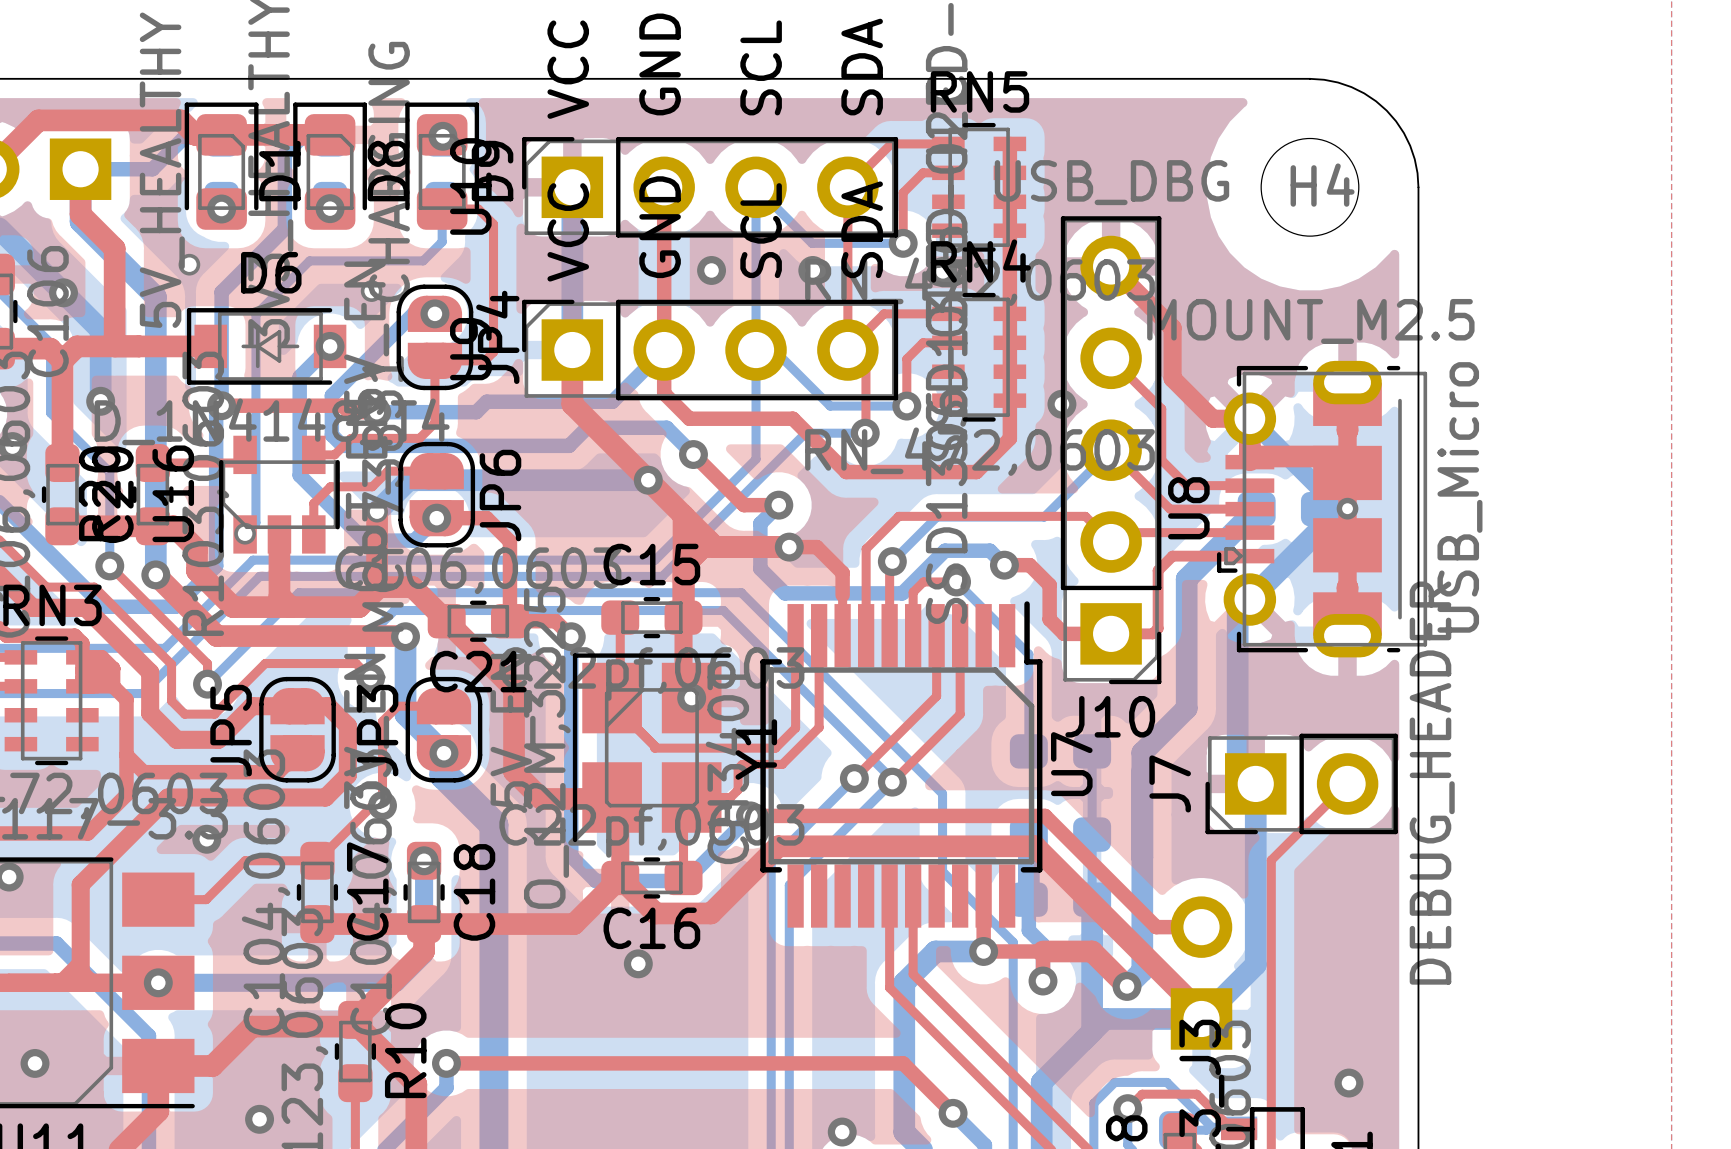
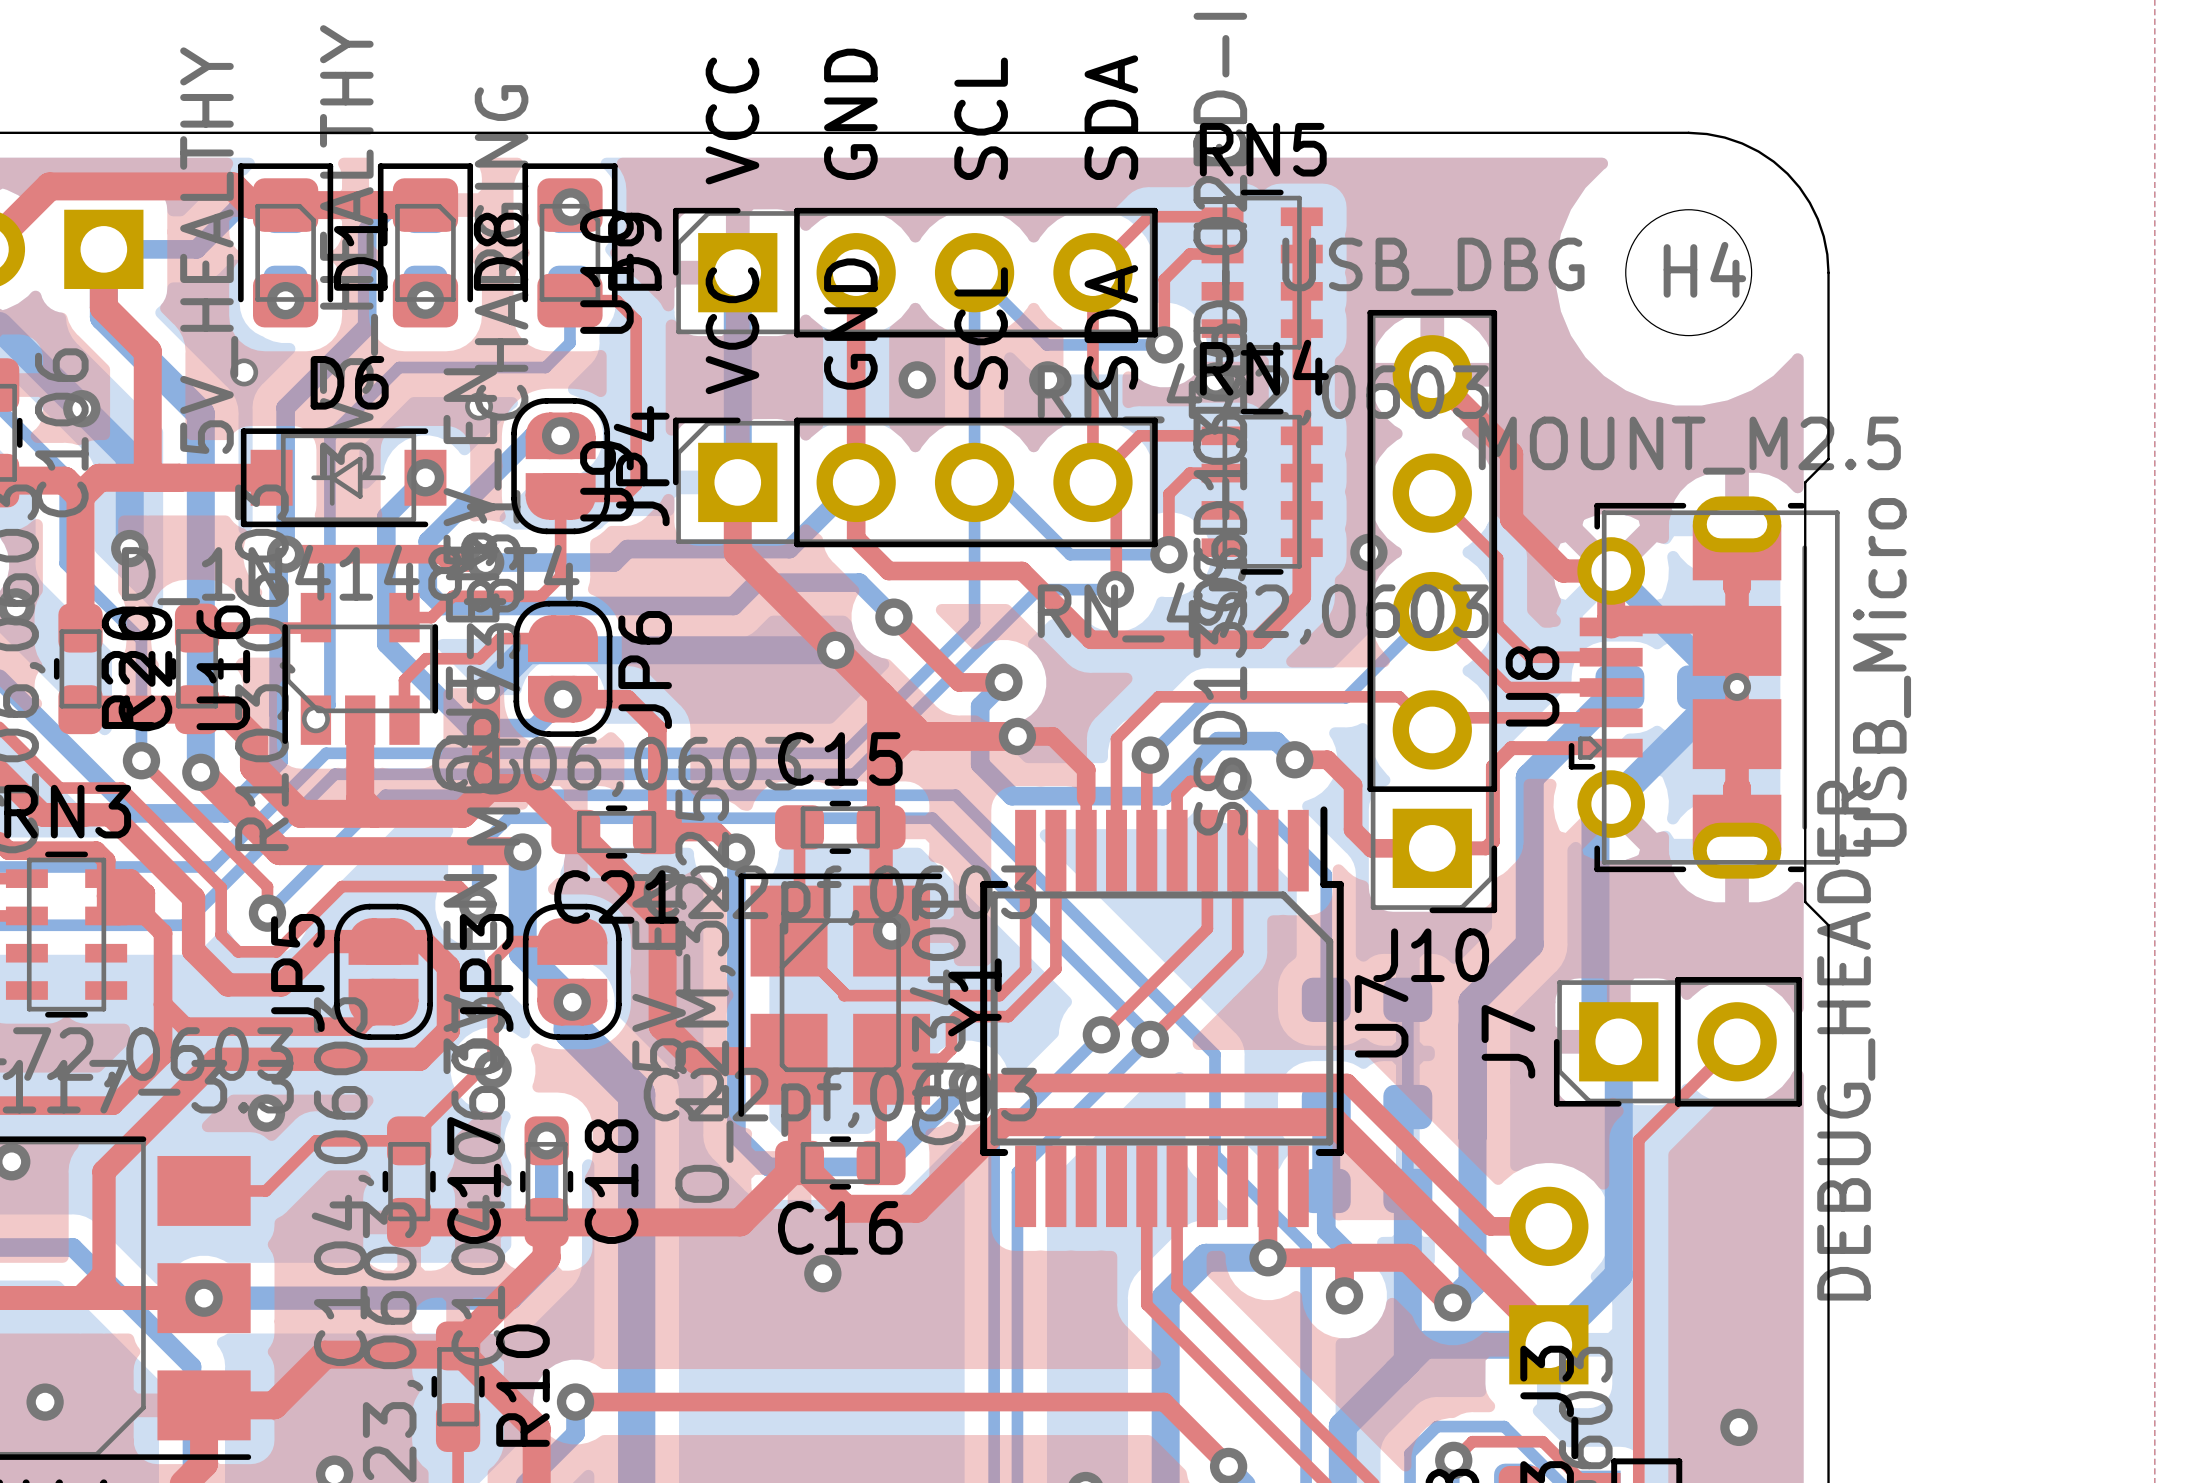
board edge: (1418, 331) (1418, 693) -> (1828, 459) (1805, 482) (1805, 901) (1828, 925)

